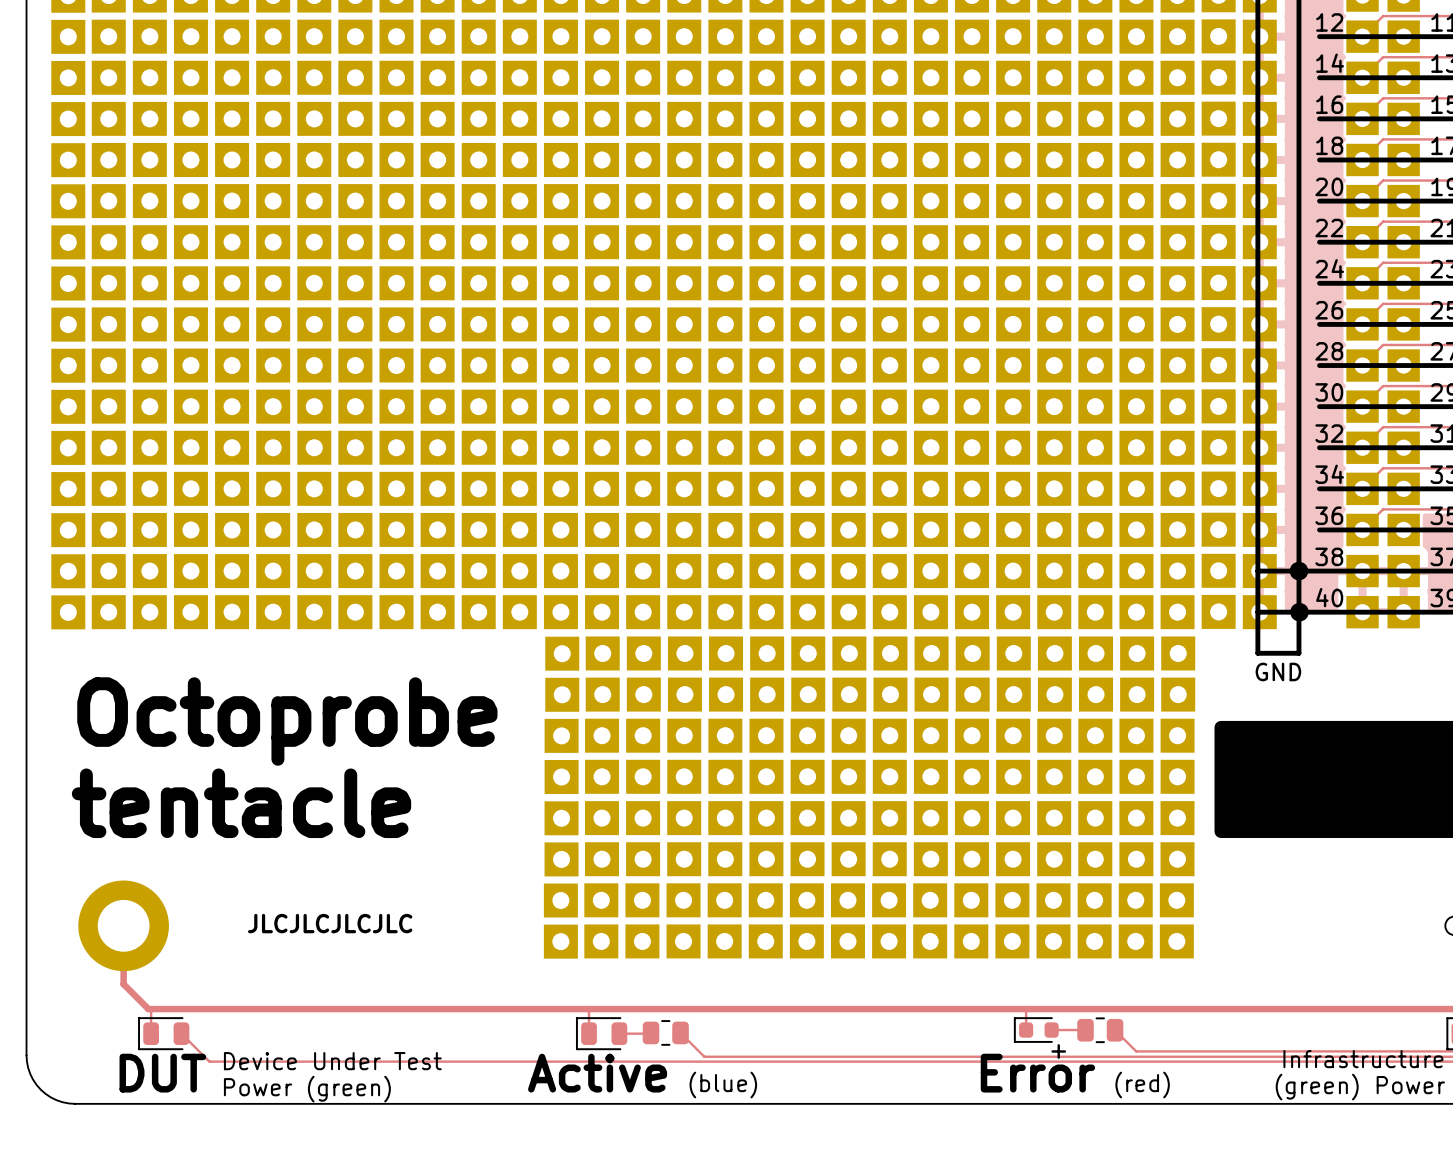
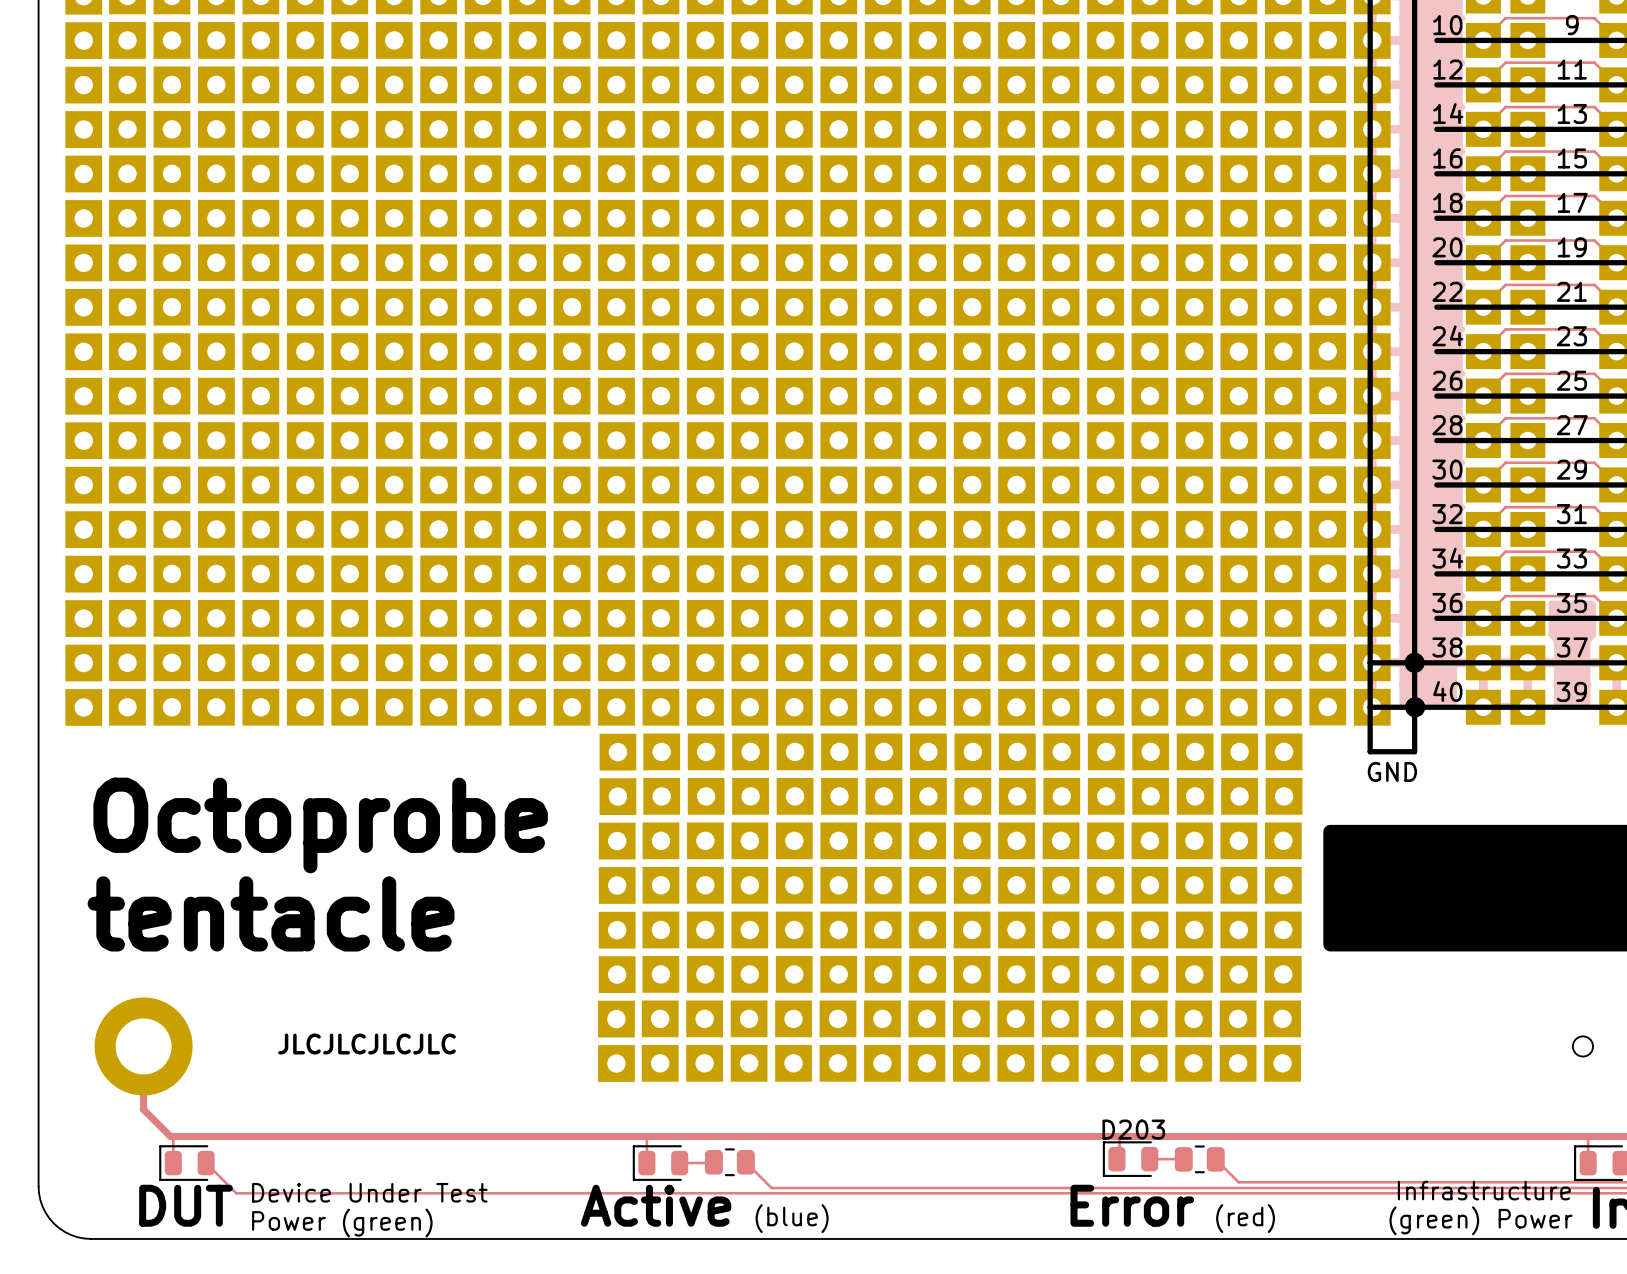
part: (1036, 1030) -> none
D203: none -> (1130, 1159)

